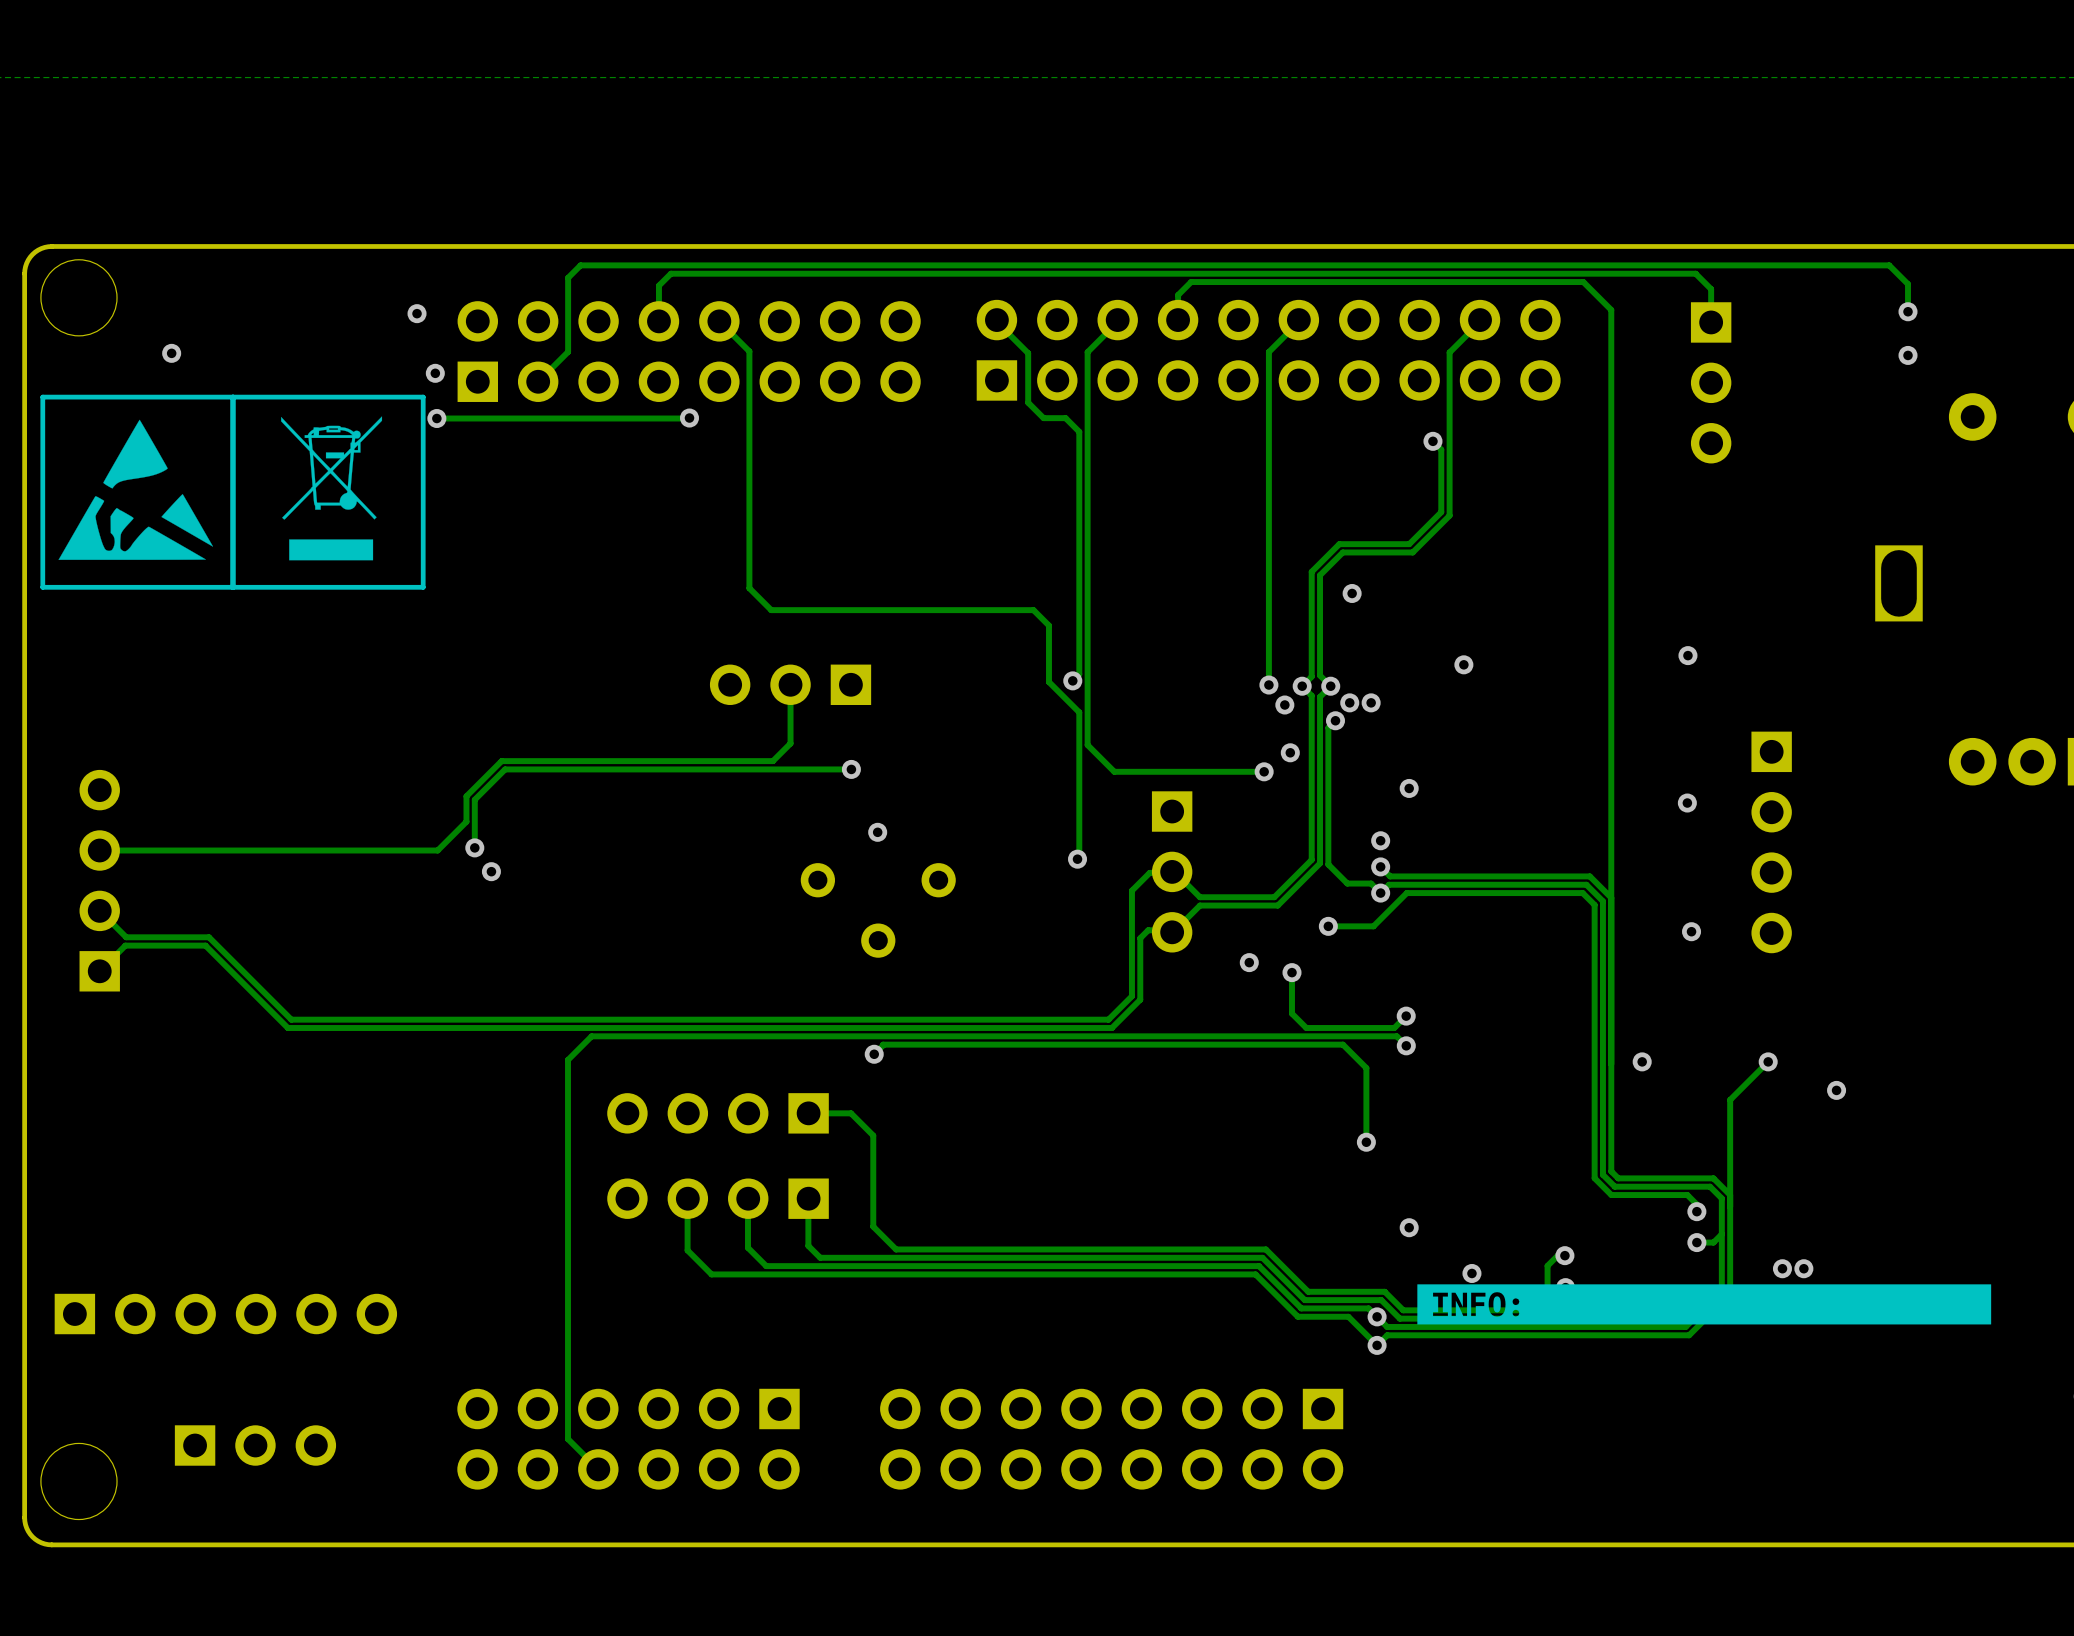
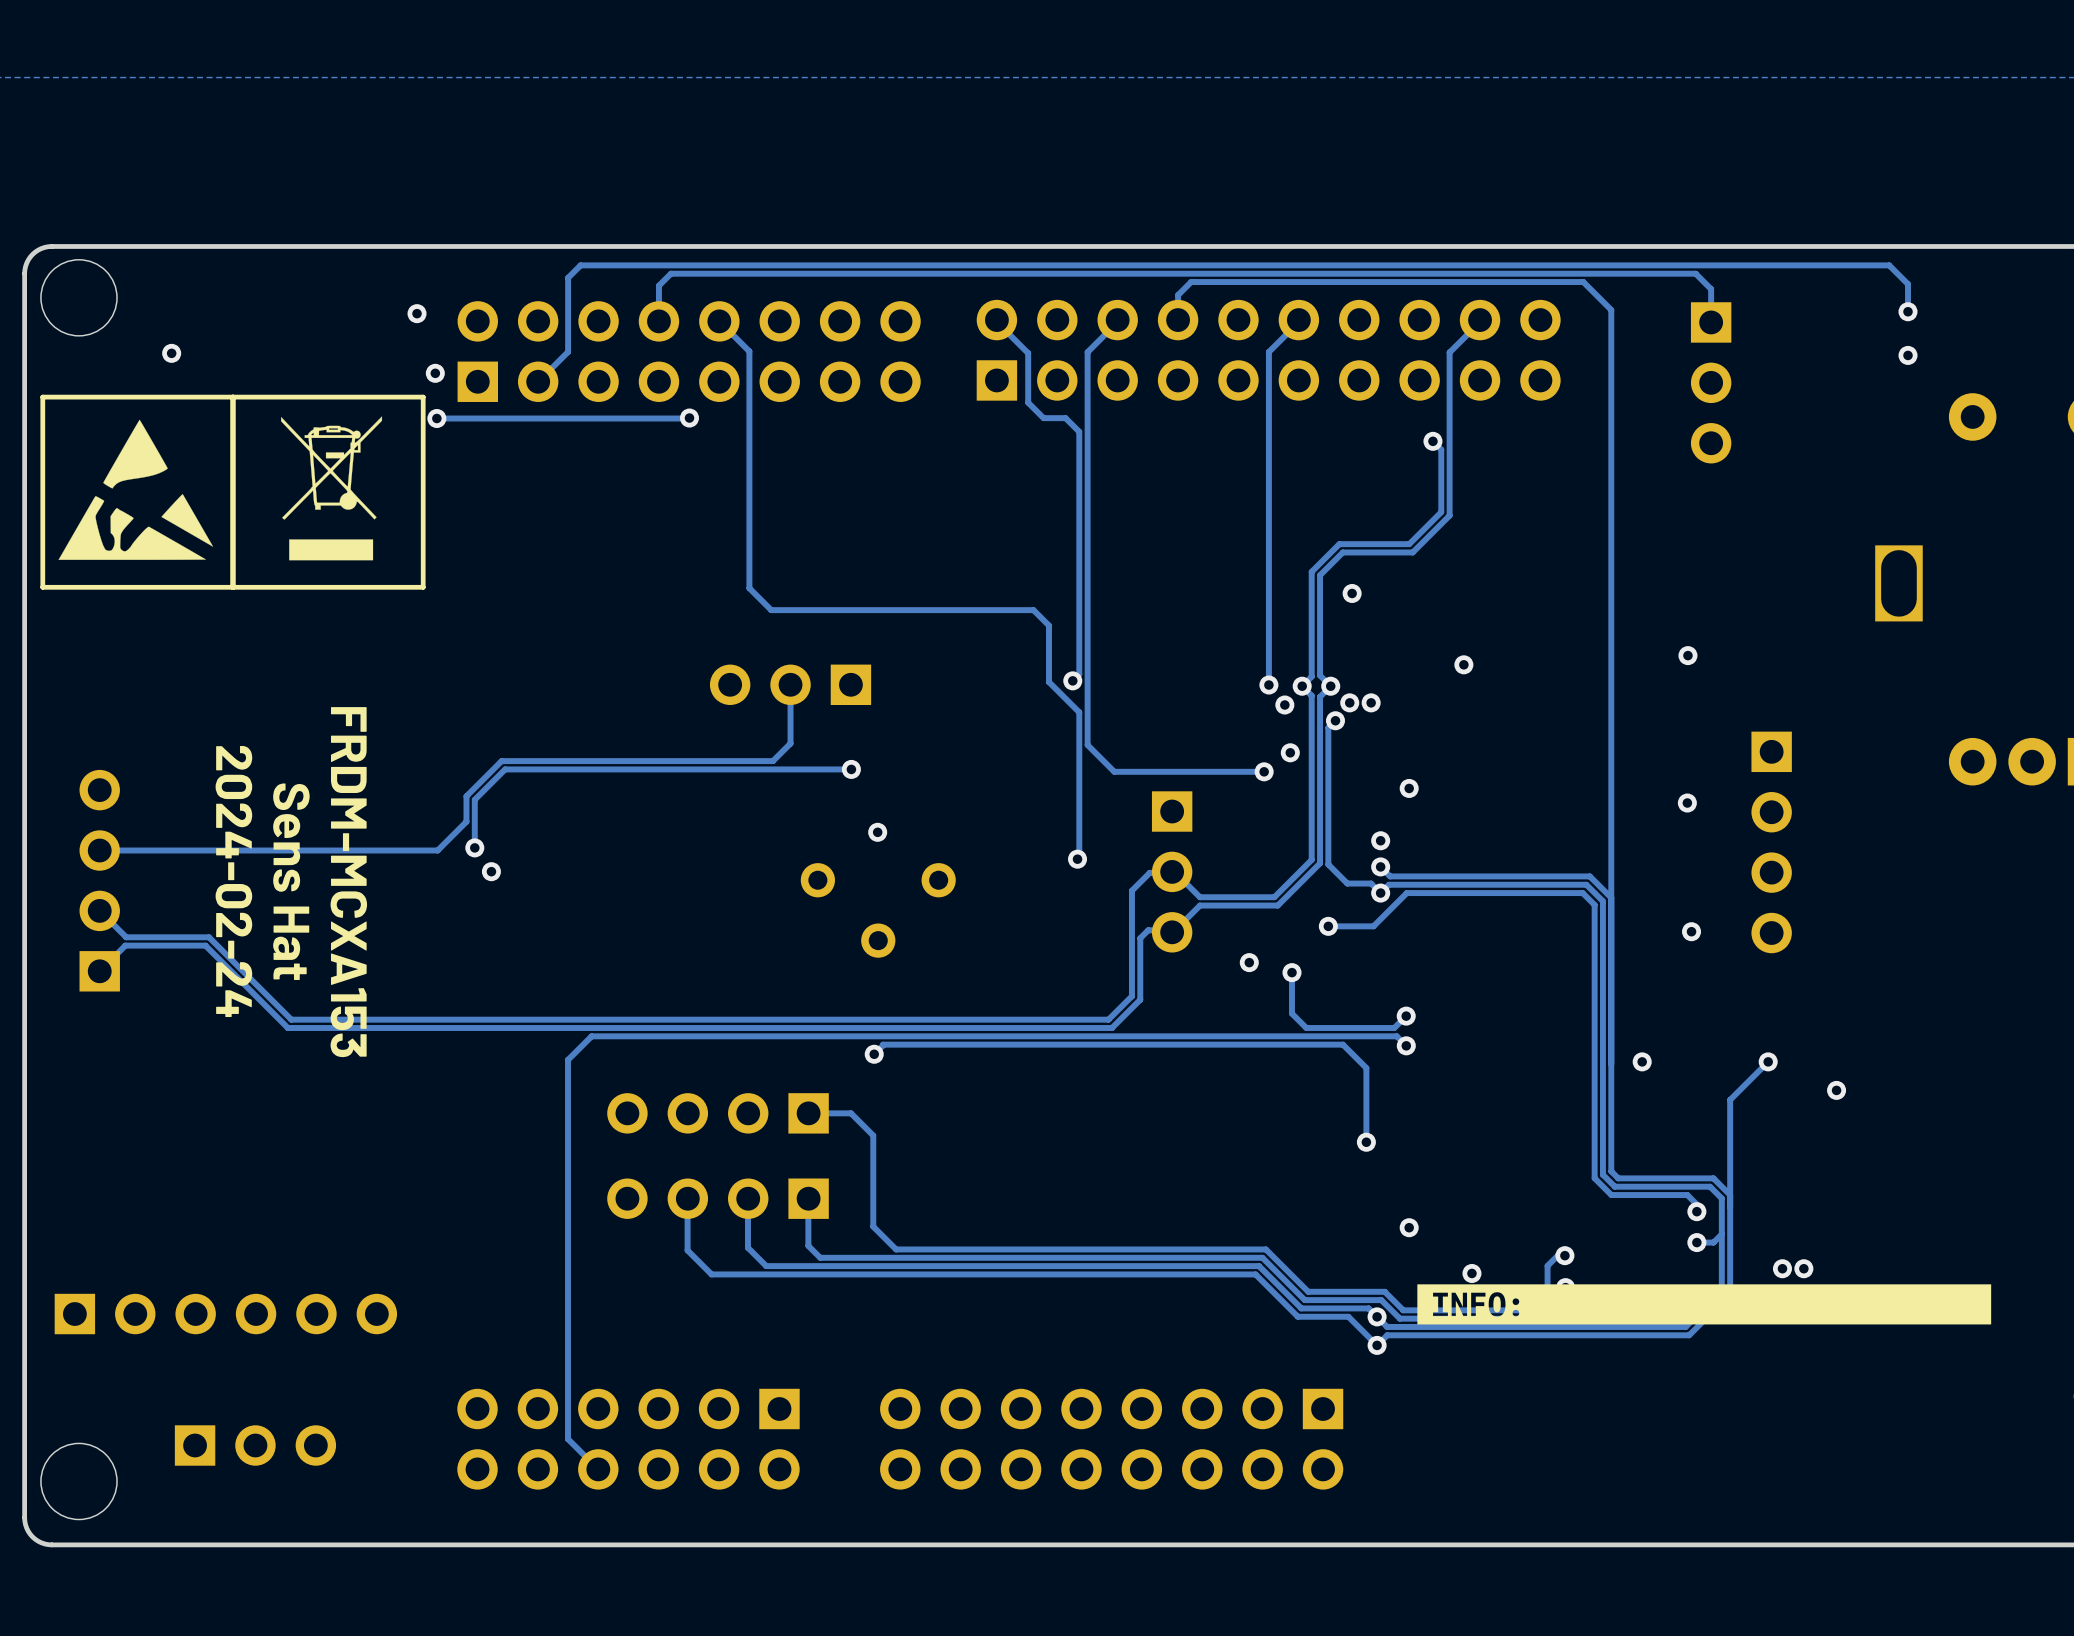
text: none -> 2024-02-24 (233, 881)
text: none -> FRDM-MCXA153 (348, 882)
text: none -> Sens Hat (291, 881)

